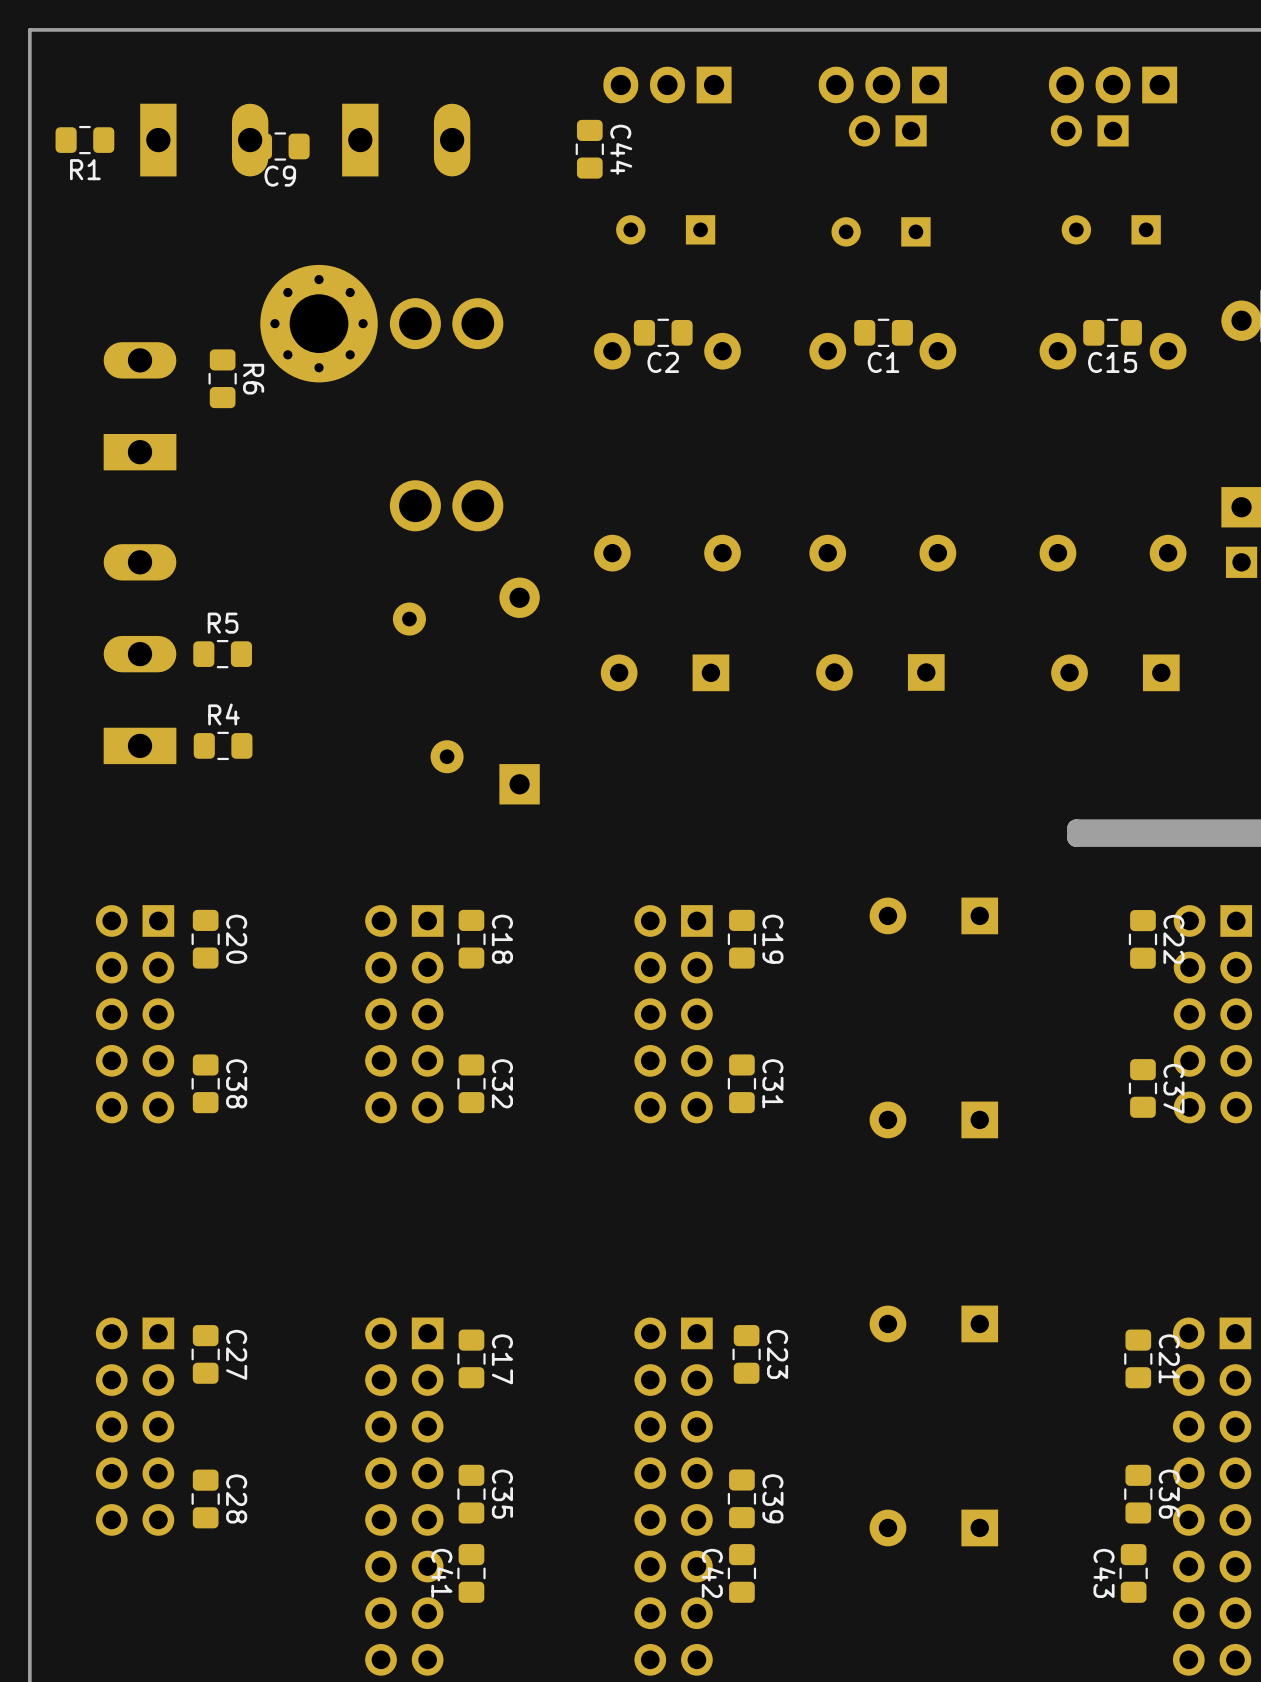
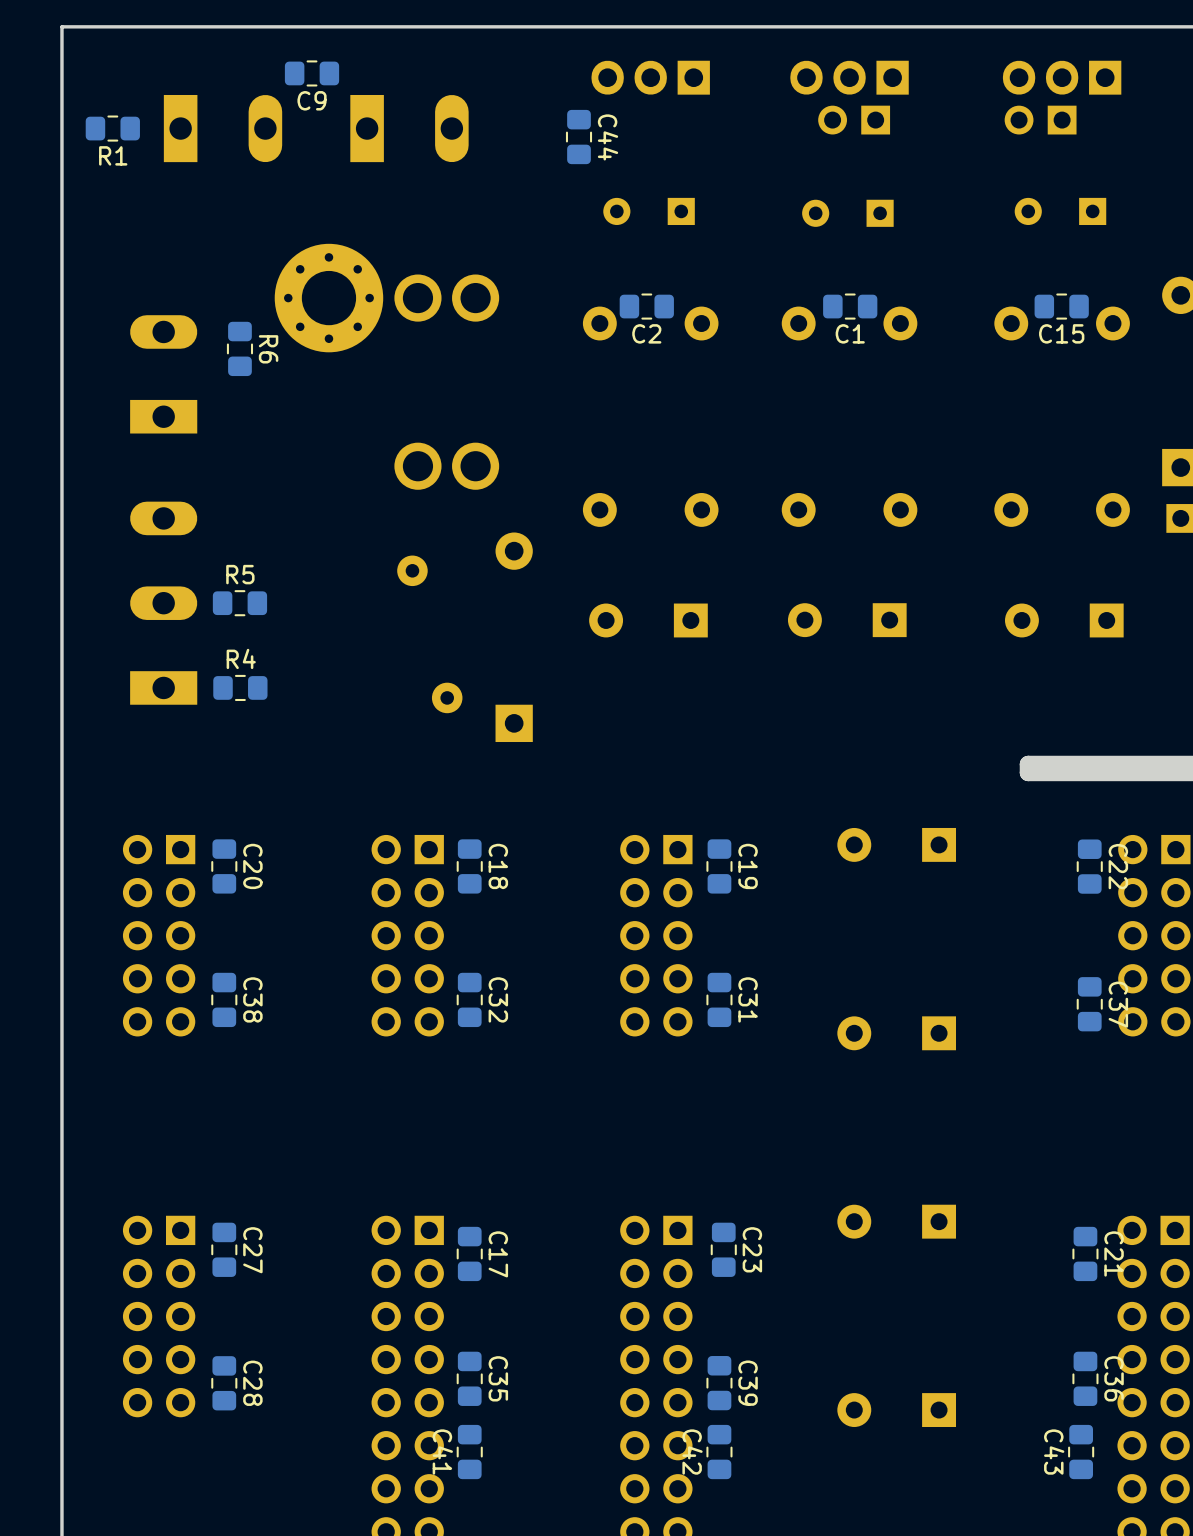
C9 position: (280, 146) -> (312, 73)

